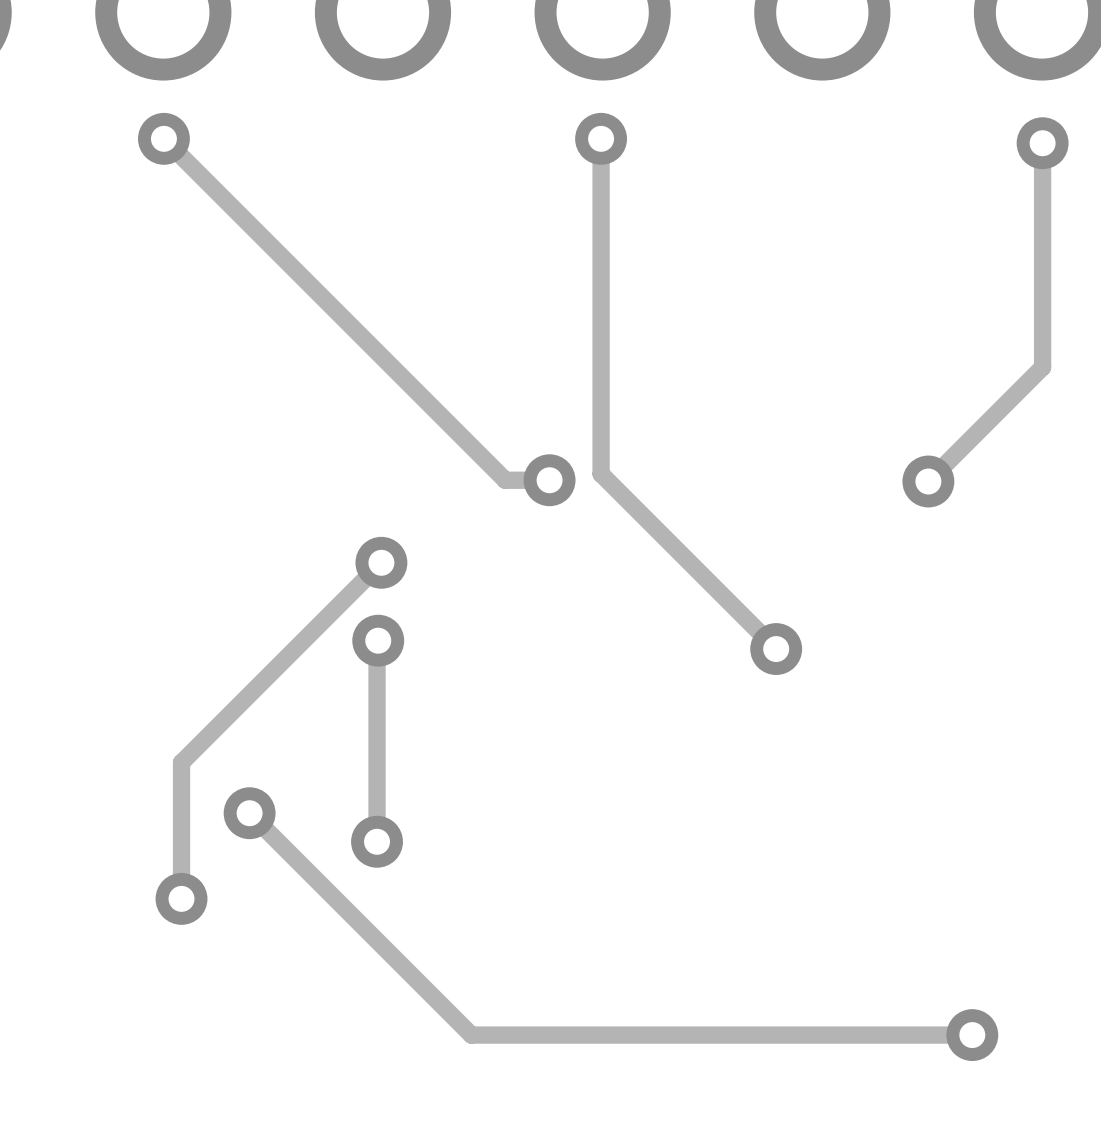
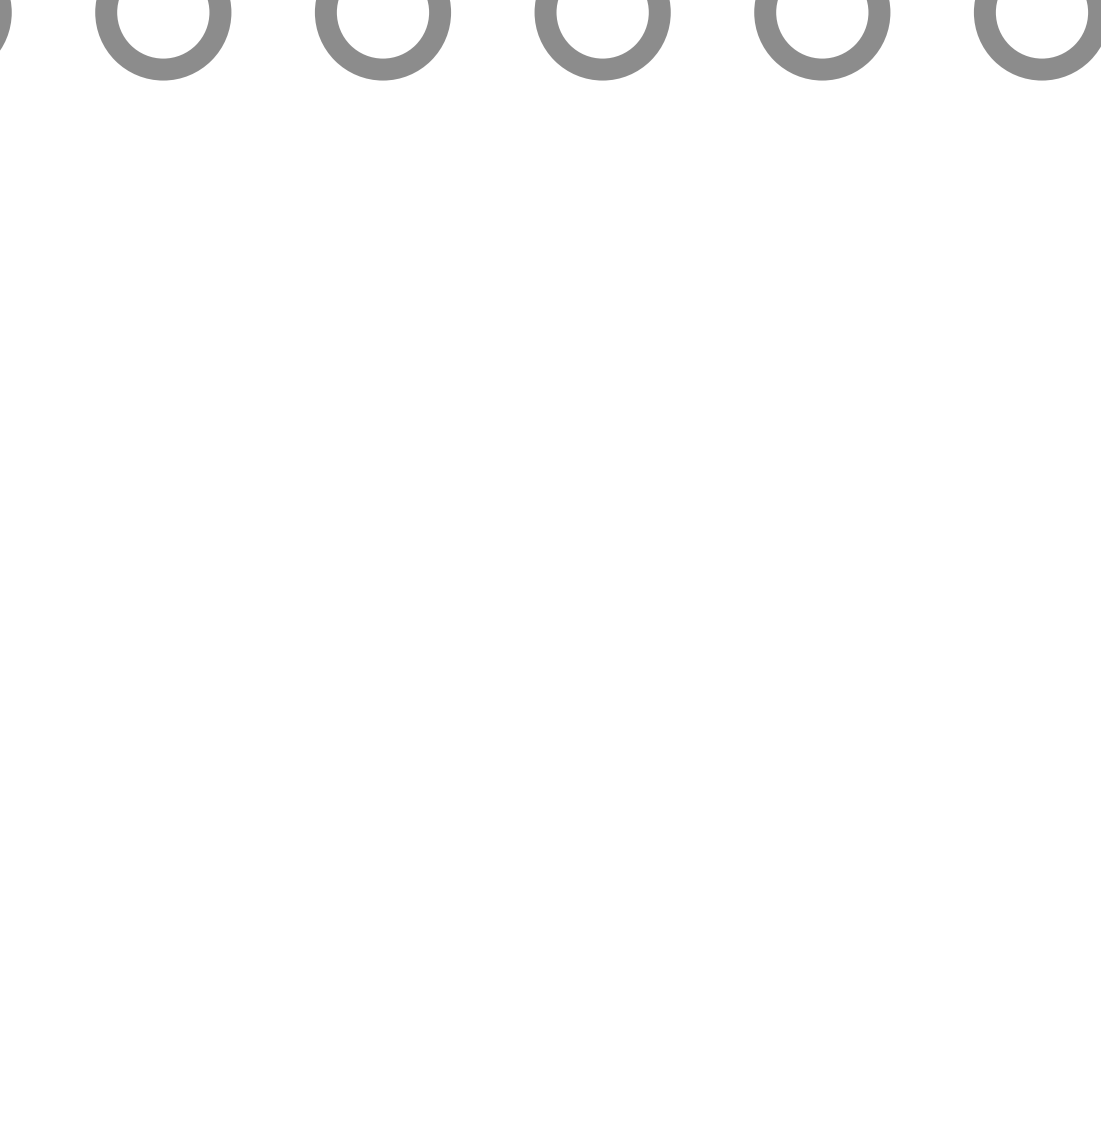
track: (163, 138) (505, 480) (549, 480) -> none
via: (163, 138) -> none
track: (601, 138) (601, 473) (776, 649) -> none
via: (601, 138) -> none
track: (1042, 143) (1042, 367) (928, 481) -> none
via: (1042, 143) -> none
via: (549, 480) -> none
via: (928, 481) -> none
track: (381, 562) (181, 762) (181, 898) -> none
via: (381, 562) -> none
via: (378, 640) -> none
track: (377, 641) (377, 841) -> none
via: (776, 649) -> none
track: (249, 813) (471, 1035) (972, 1035) -> none
via: (249, 813) -> none
via: (377, 841) -> none
via: (181, 898) -> none
via: (972, 1035) -> none

